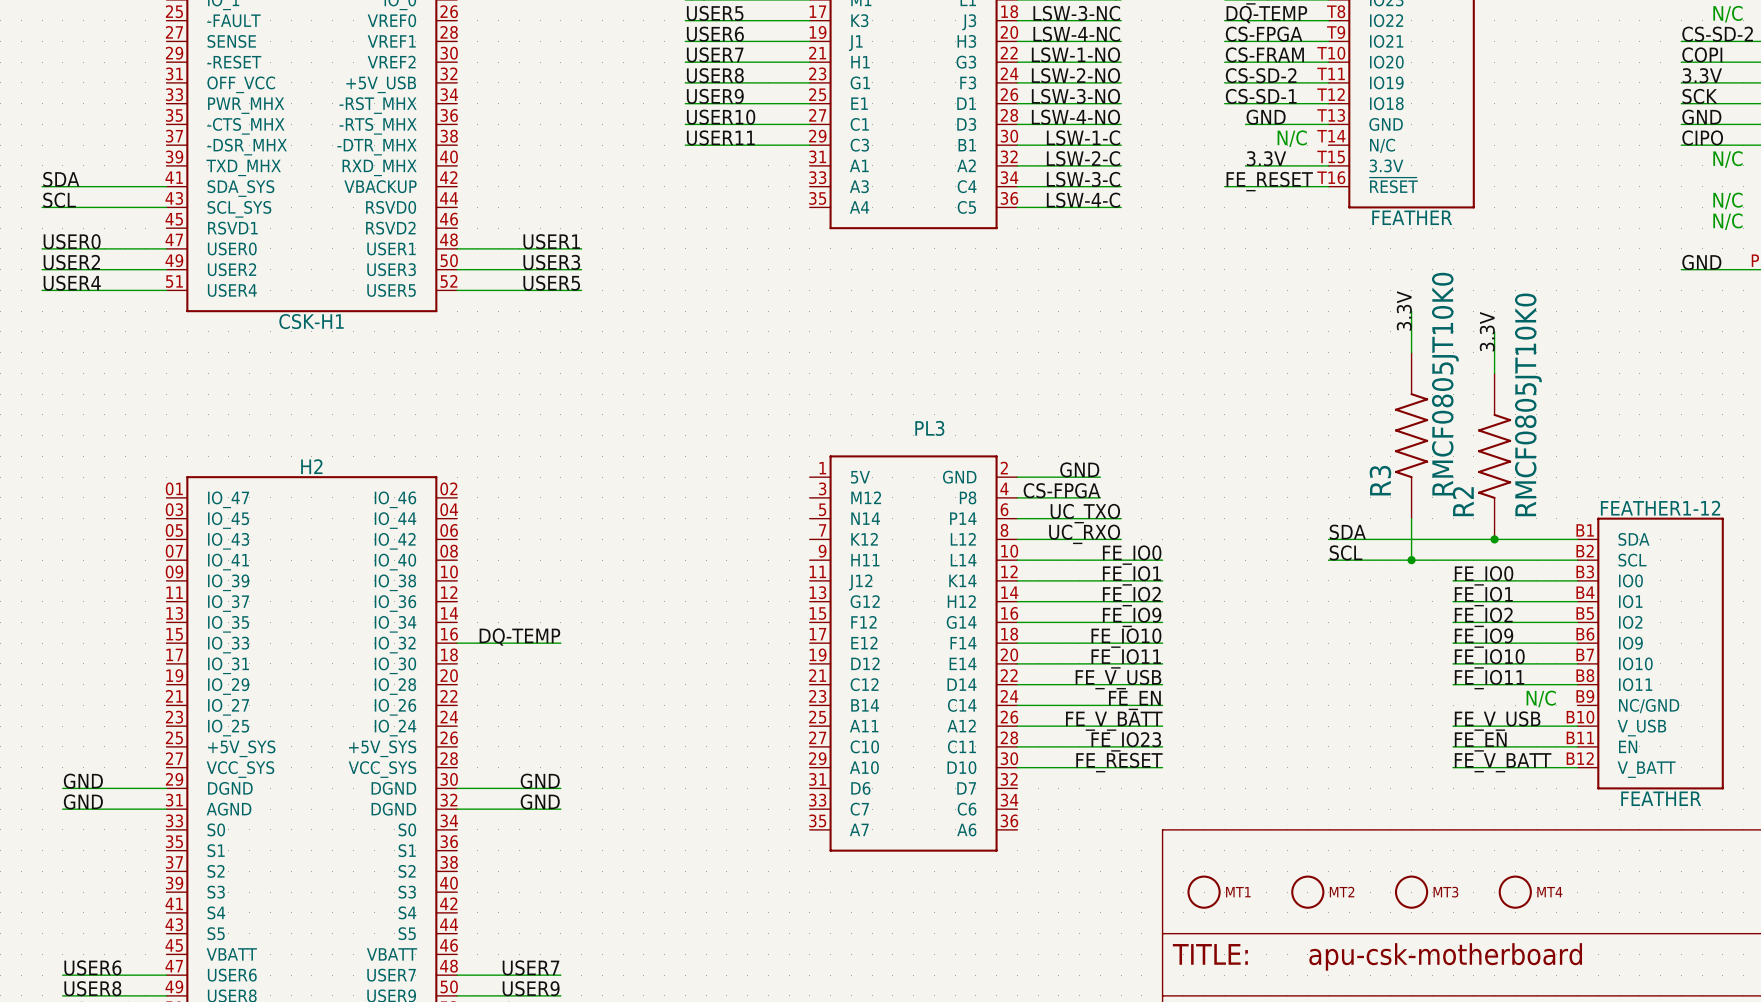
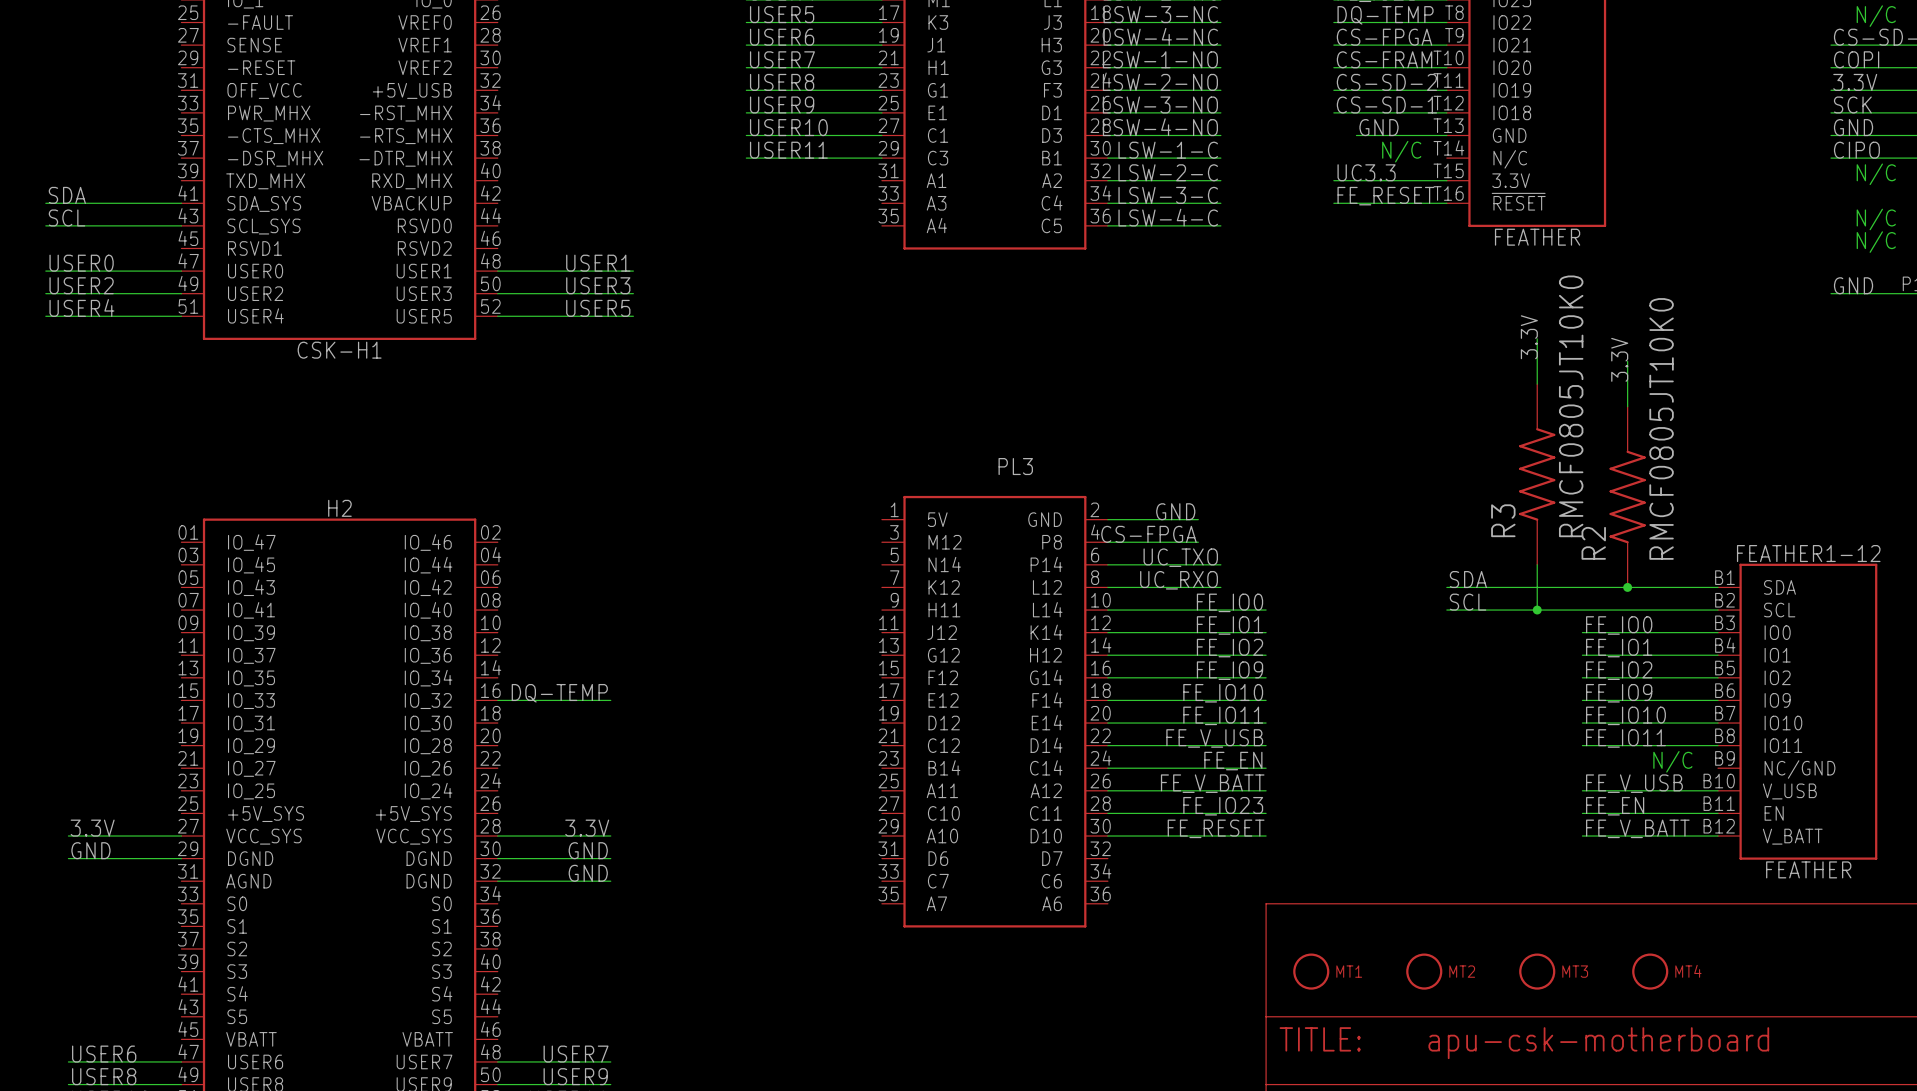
label: 3.3V (1266, 158) -> UC3.3 (1366, 172)
wire: none -> (1333, 180) (1356, 180)
label: none -> 3.3V (92, 828)
label: none -> 3.3V (587, 828)
wire: none -> (497, 836) (610, 836)
label: GND (83, 801) -> none
wire: (62, 809) (166, 809) -> (68, 836) (181, 836)

